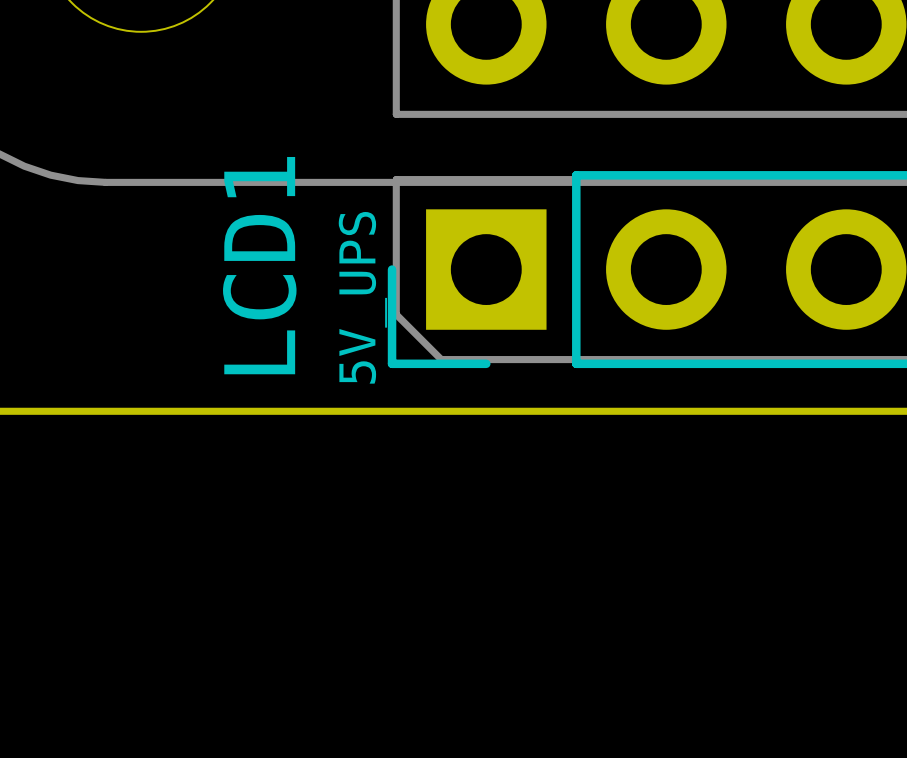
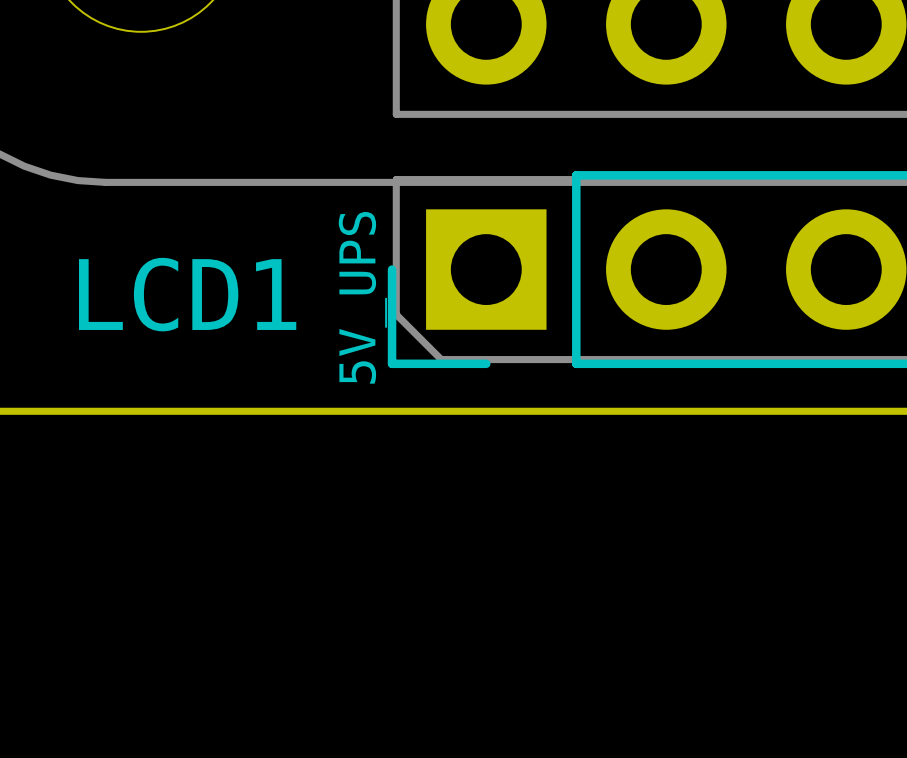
LCD1 name rotation: 0° (259, 265) -> 90° clockwise (187, 294)

